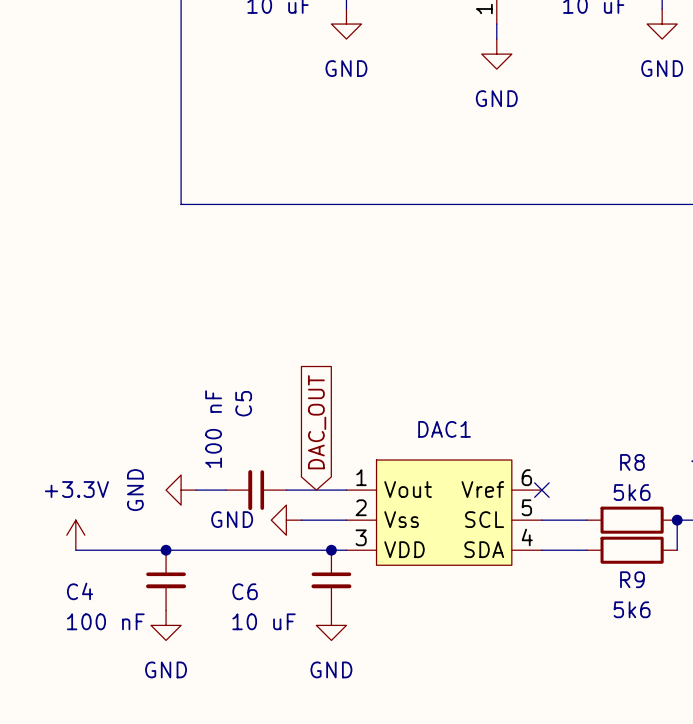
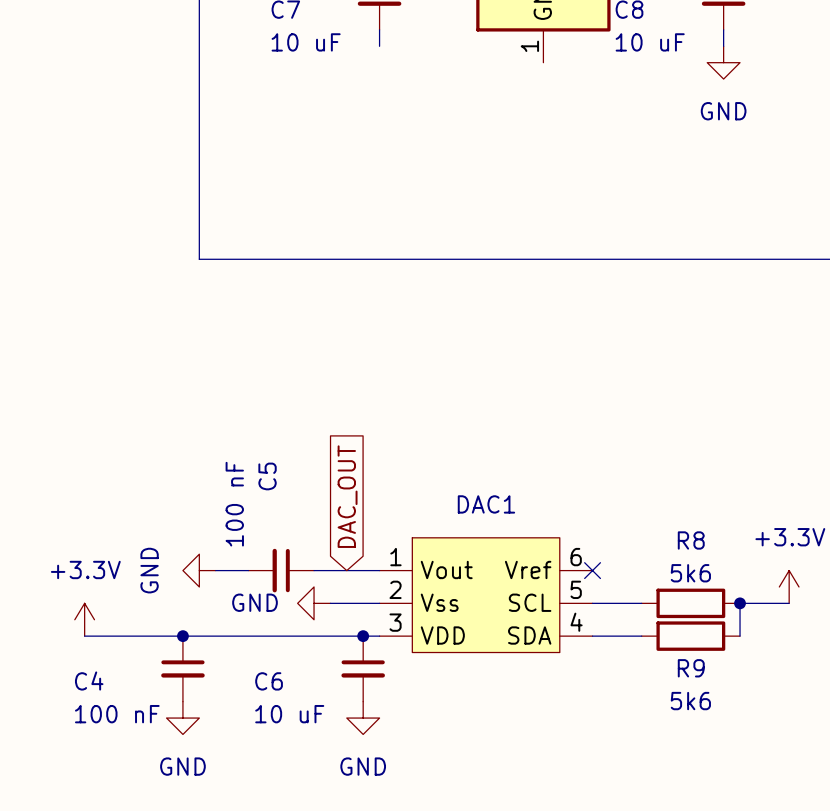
power symbol: GND (346, 24) -> none
wire: (496, 24) (496, 39) -> none
power symbol: GND (496, 54) -> none

